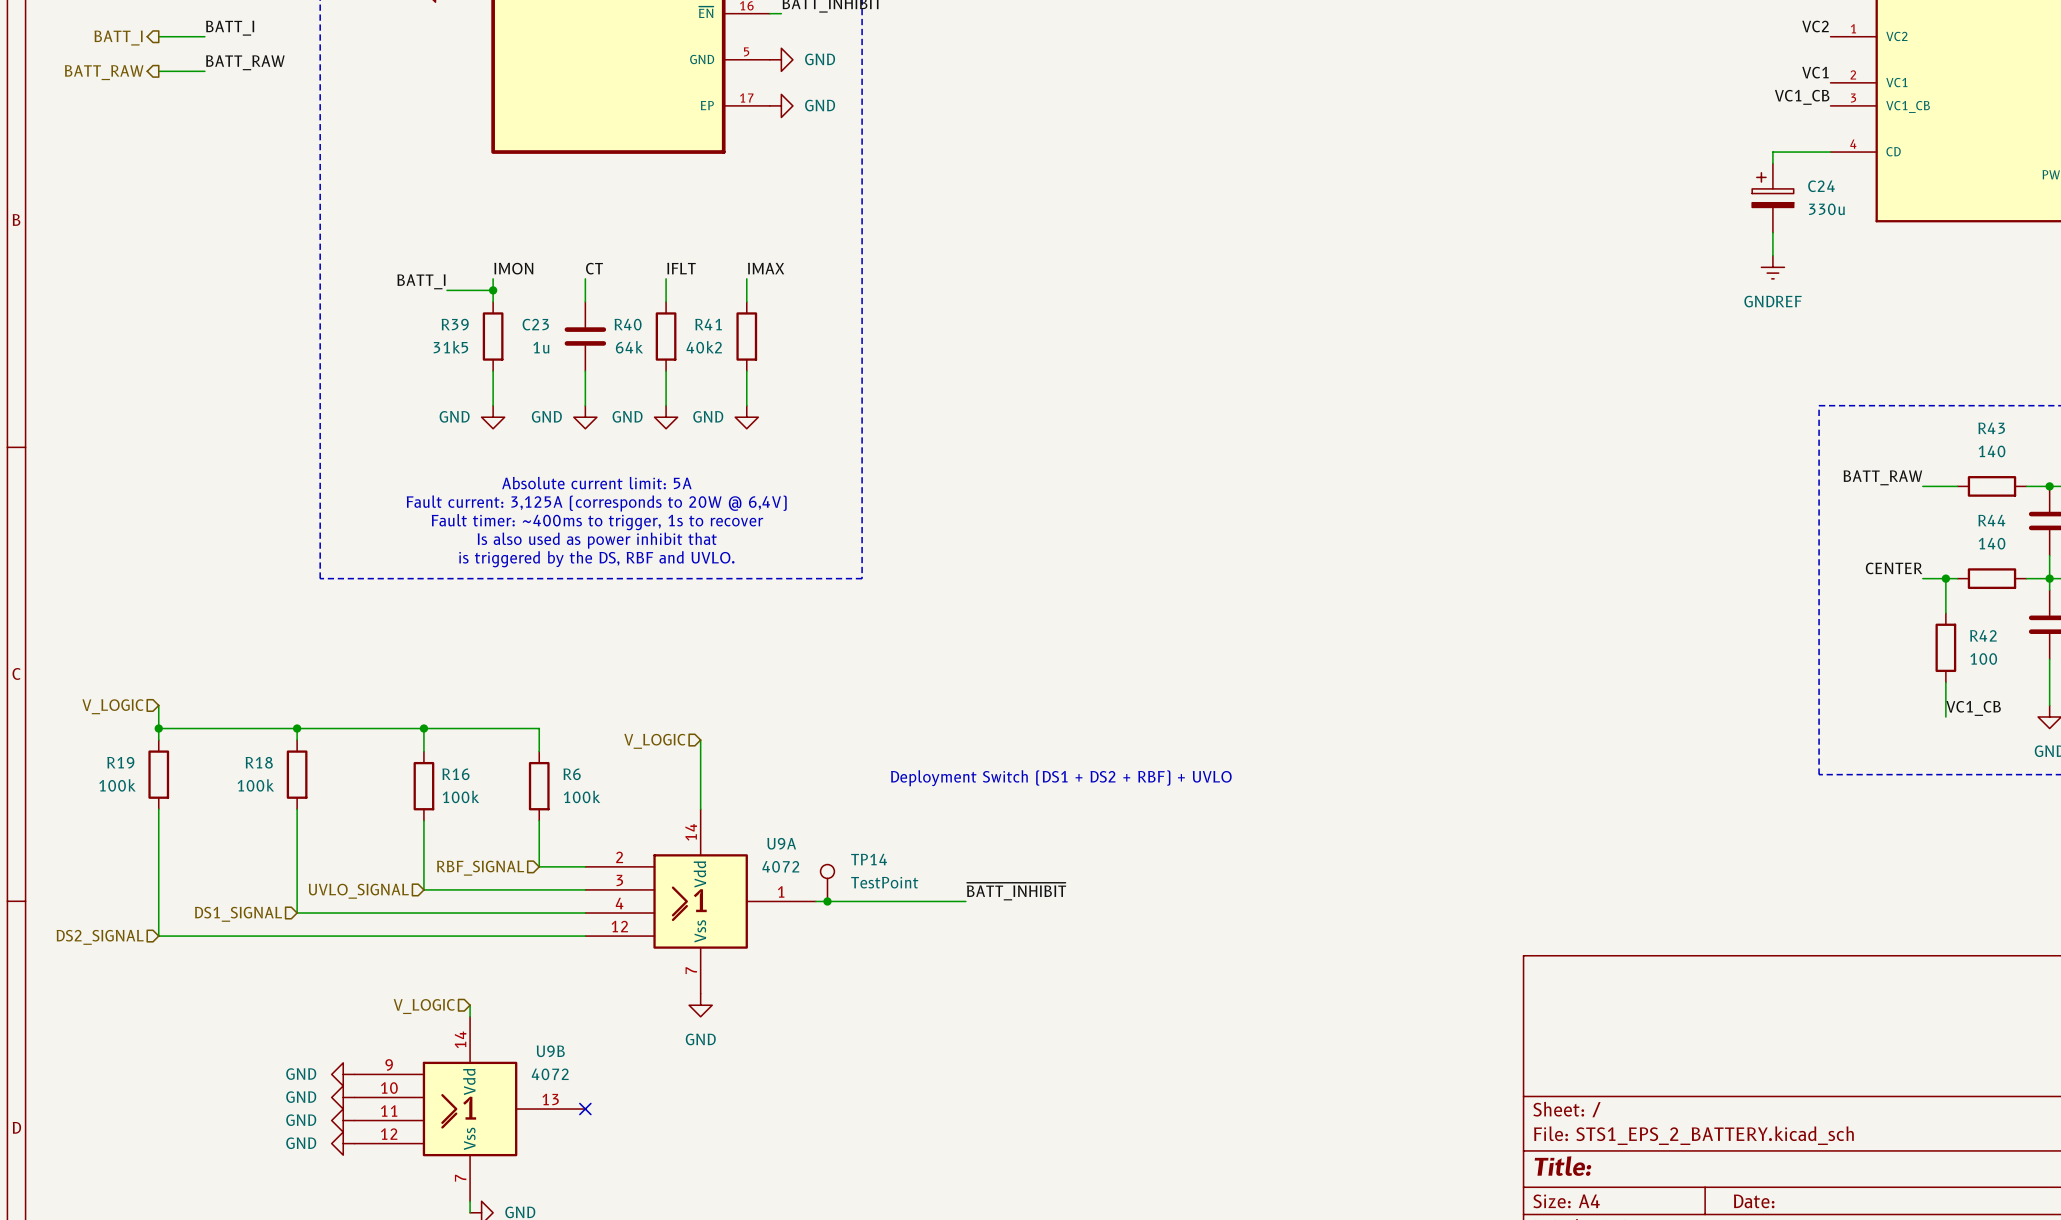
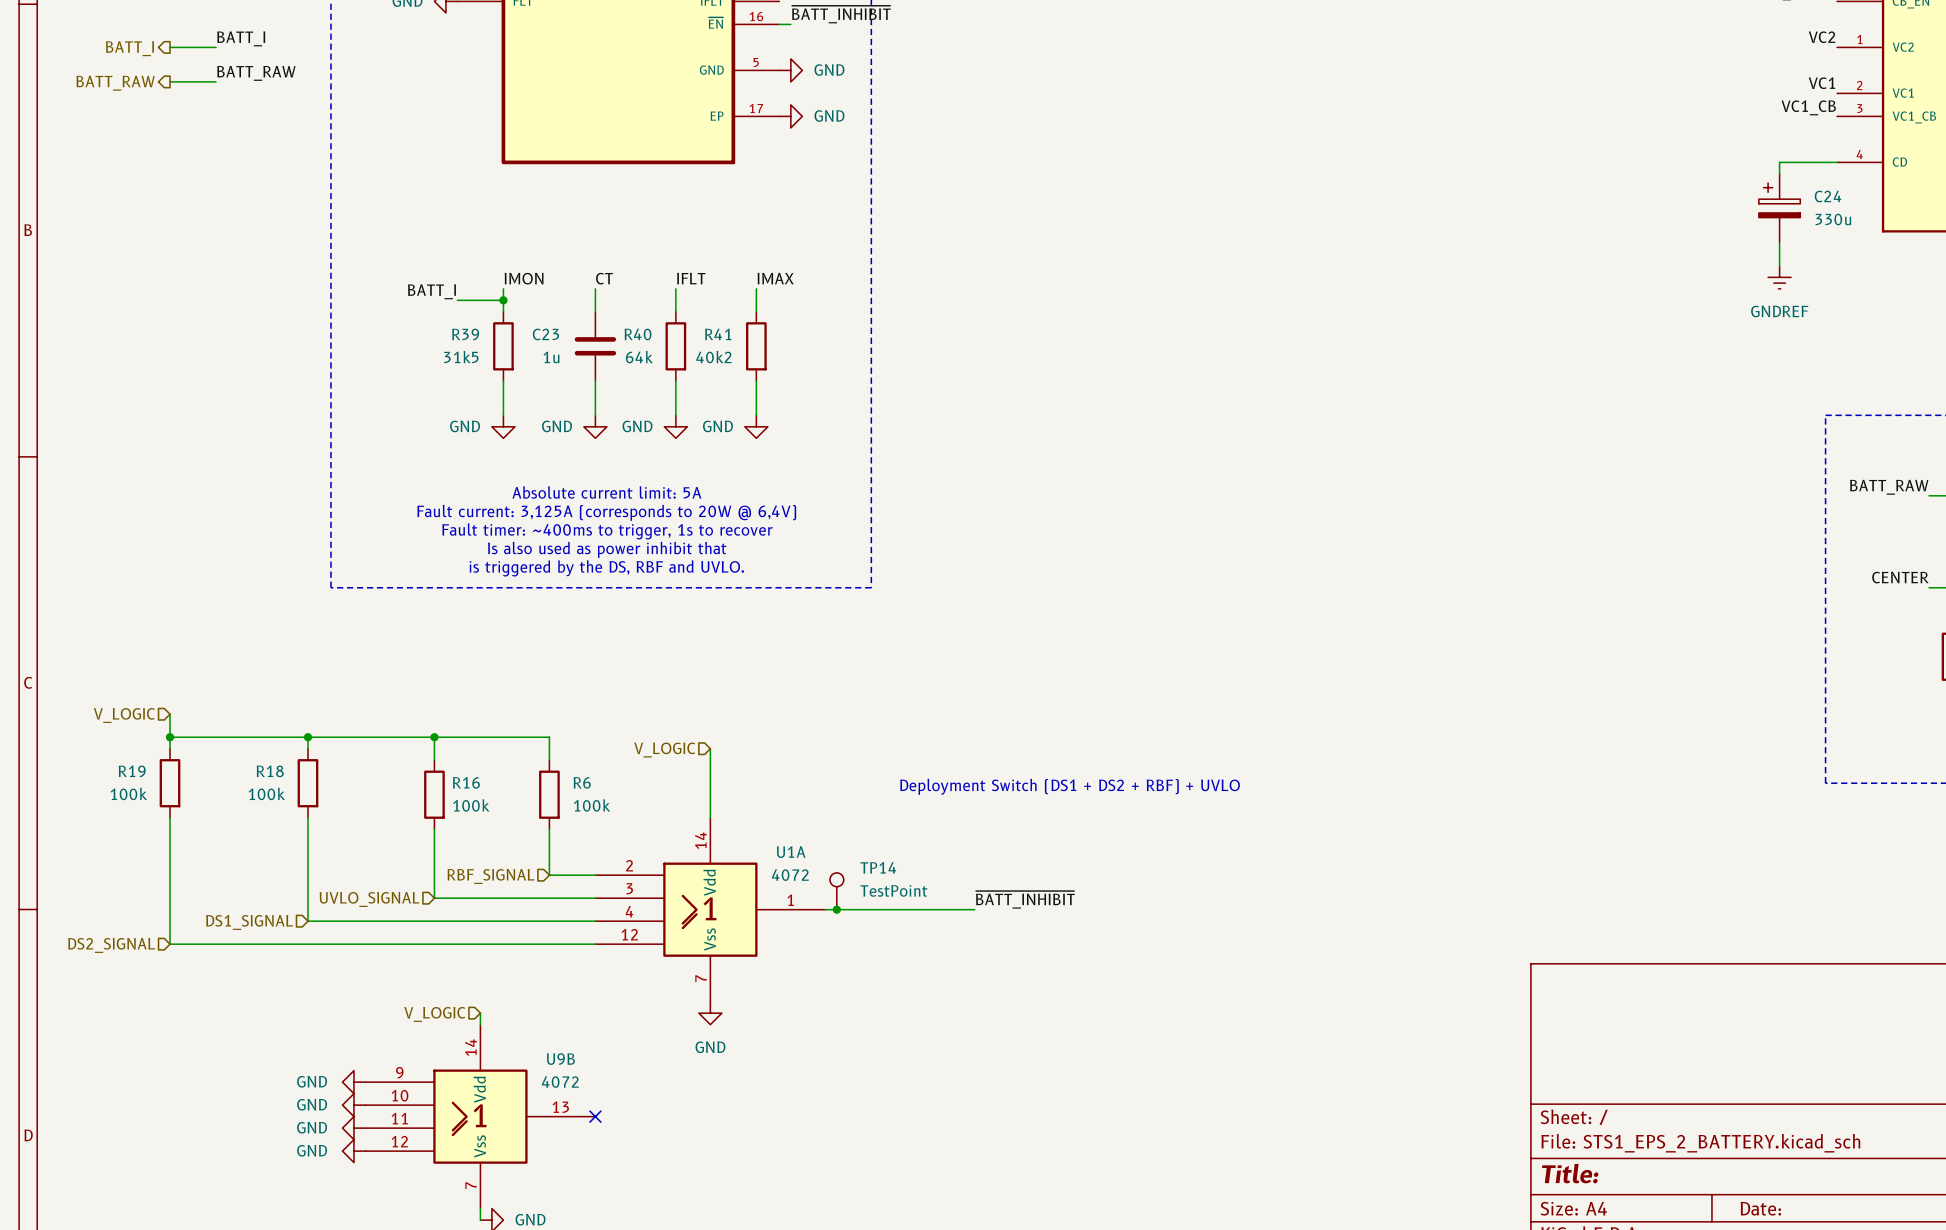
U9A name: U9A (781, 843) -> U1A (791, 852)

